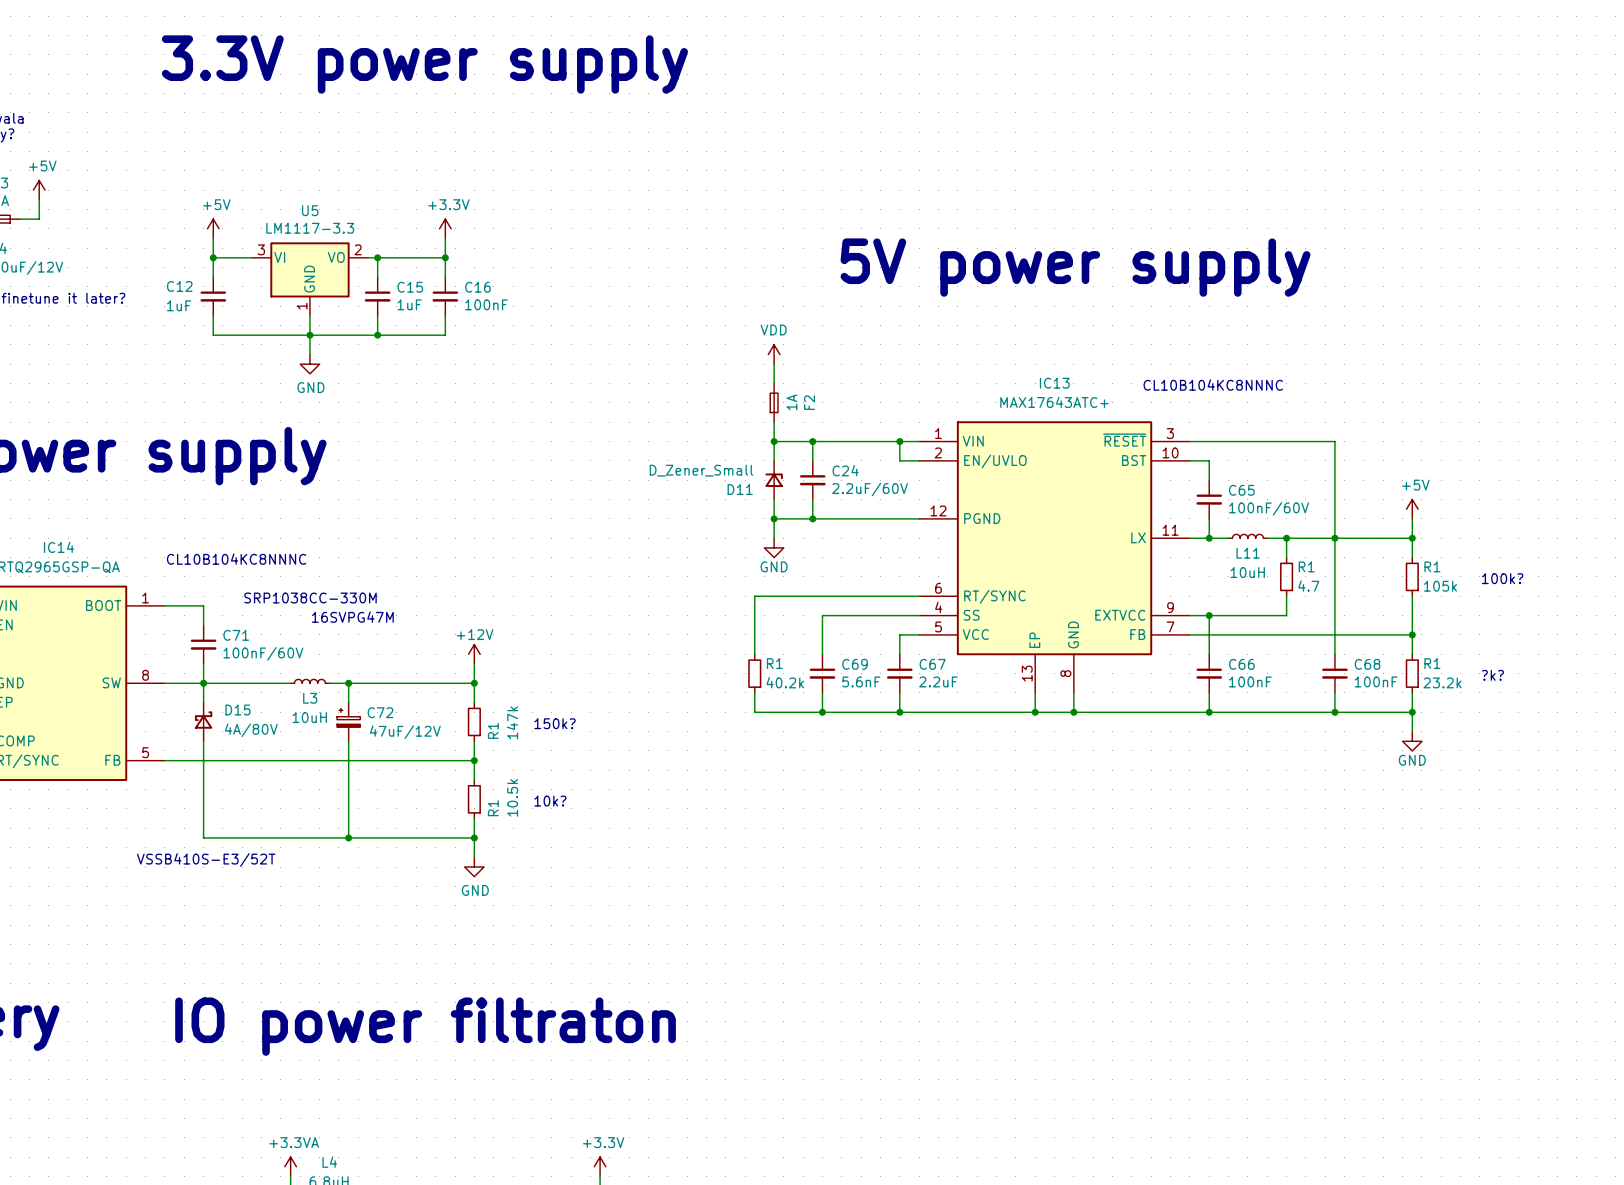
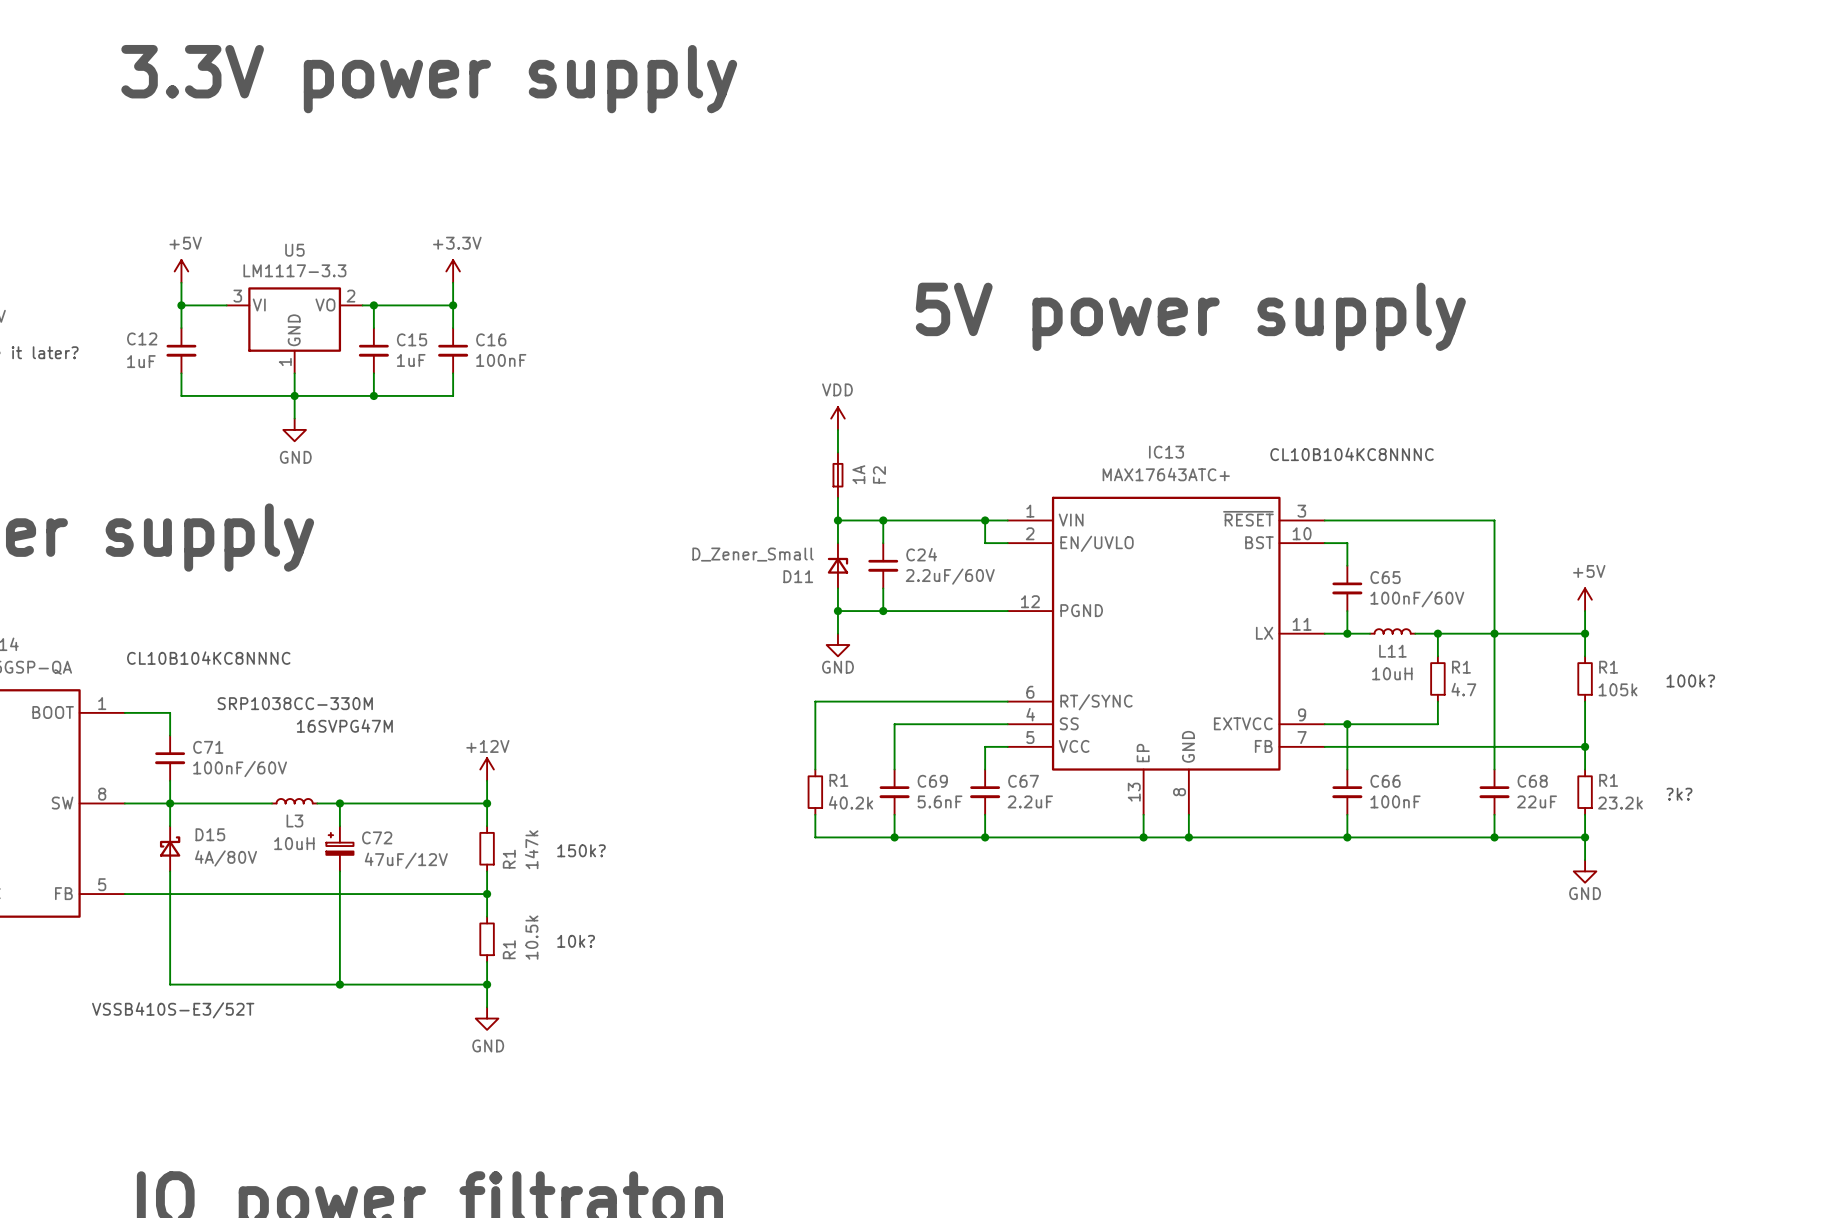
C68 value: 100nF (1376, 681) -> 22uF (1536, 801)

